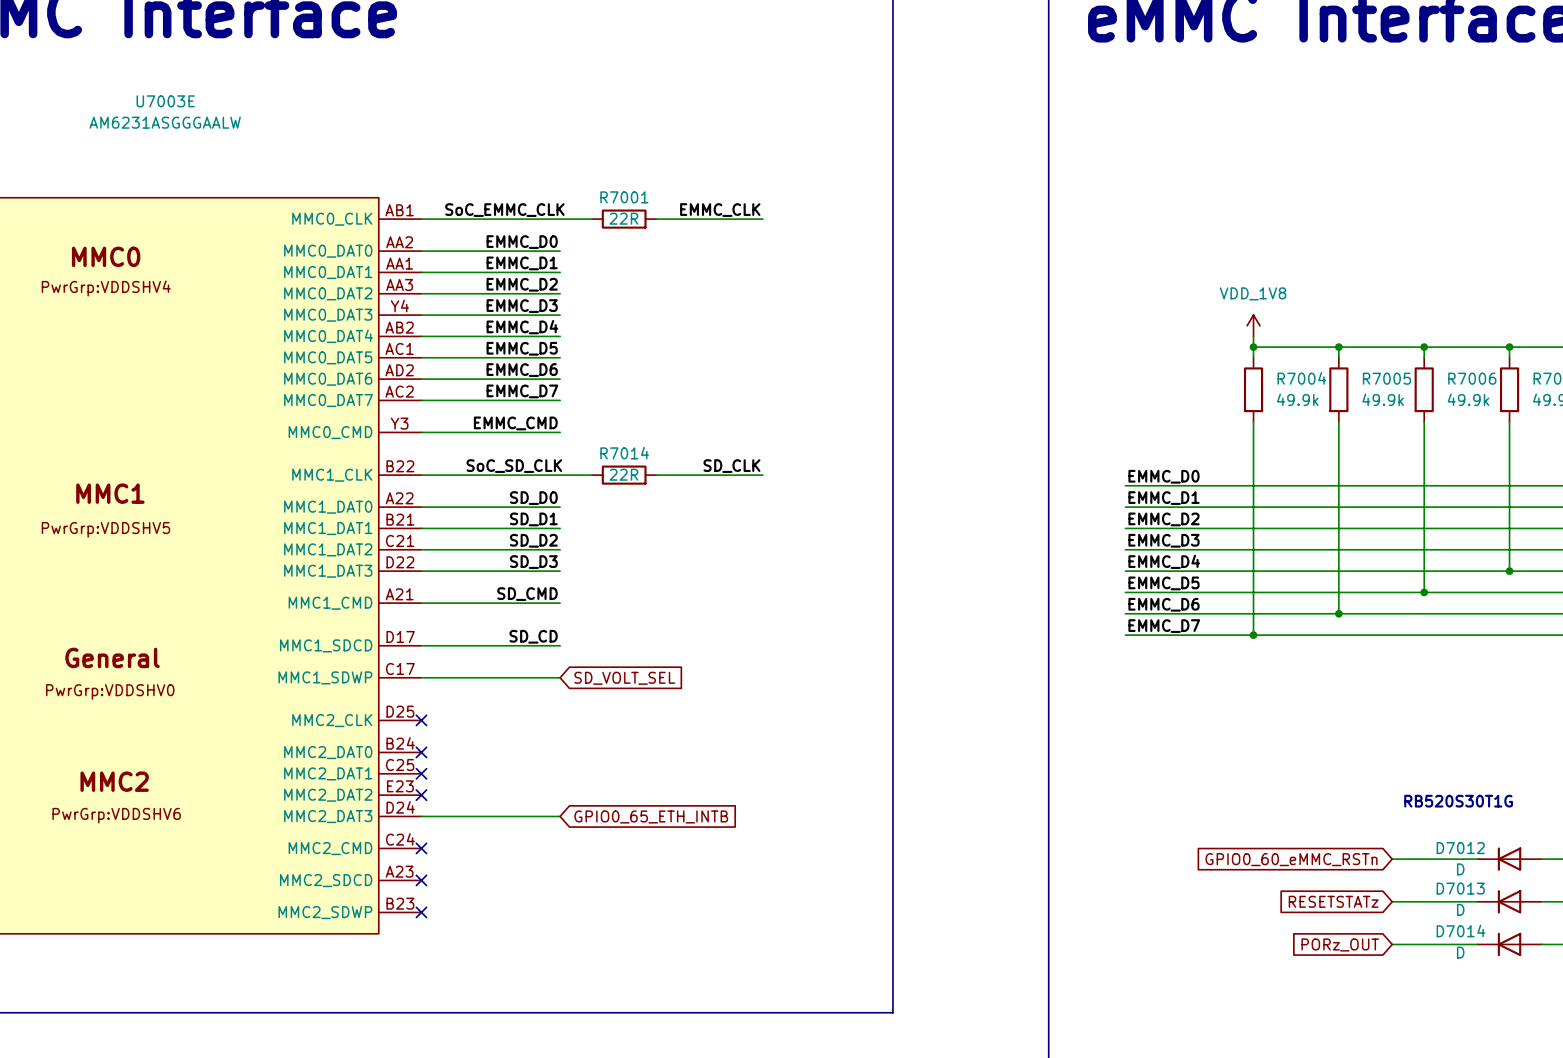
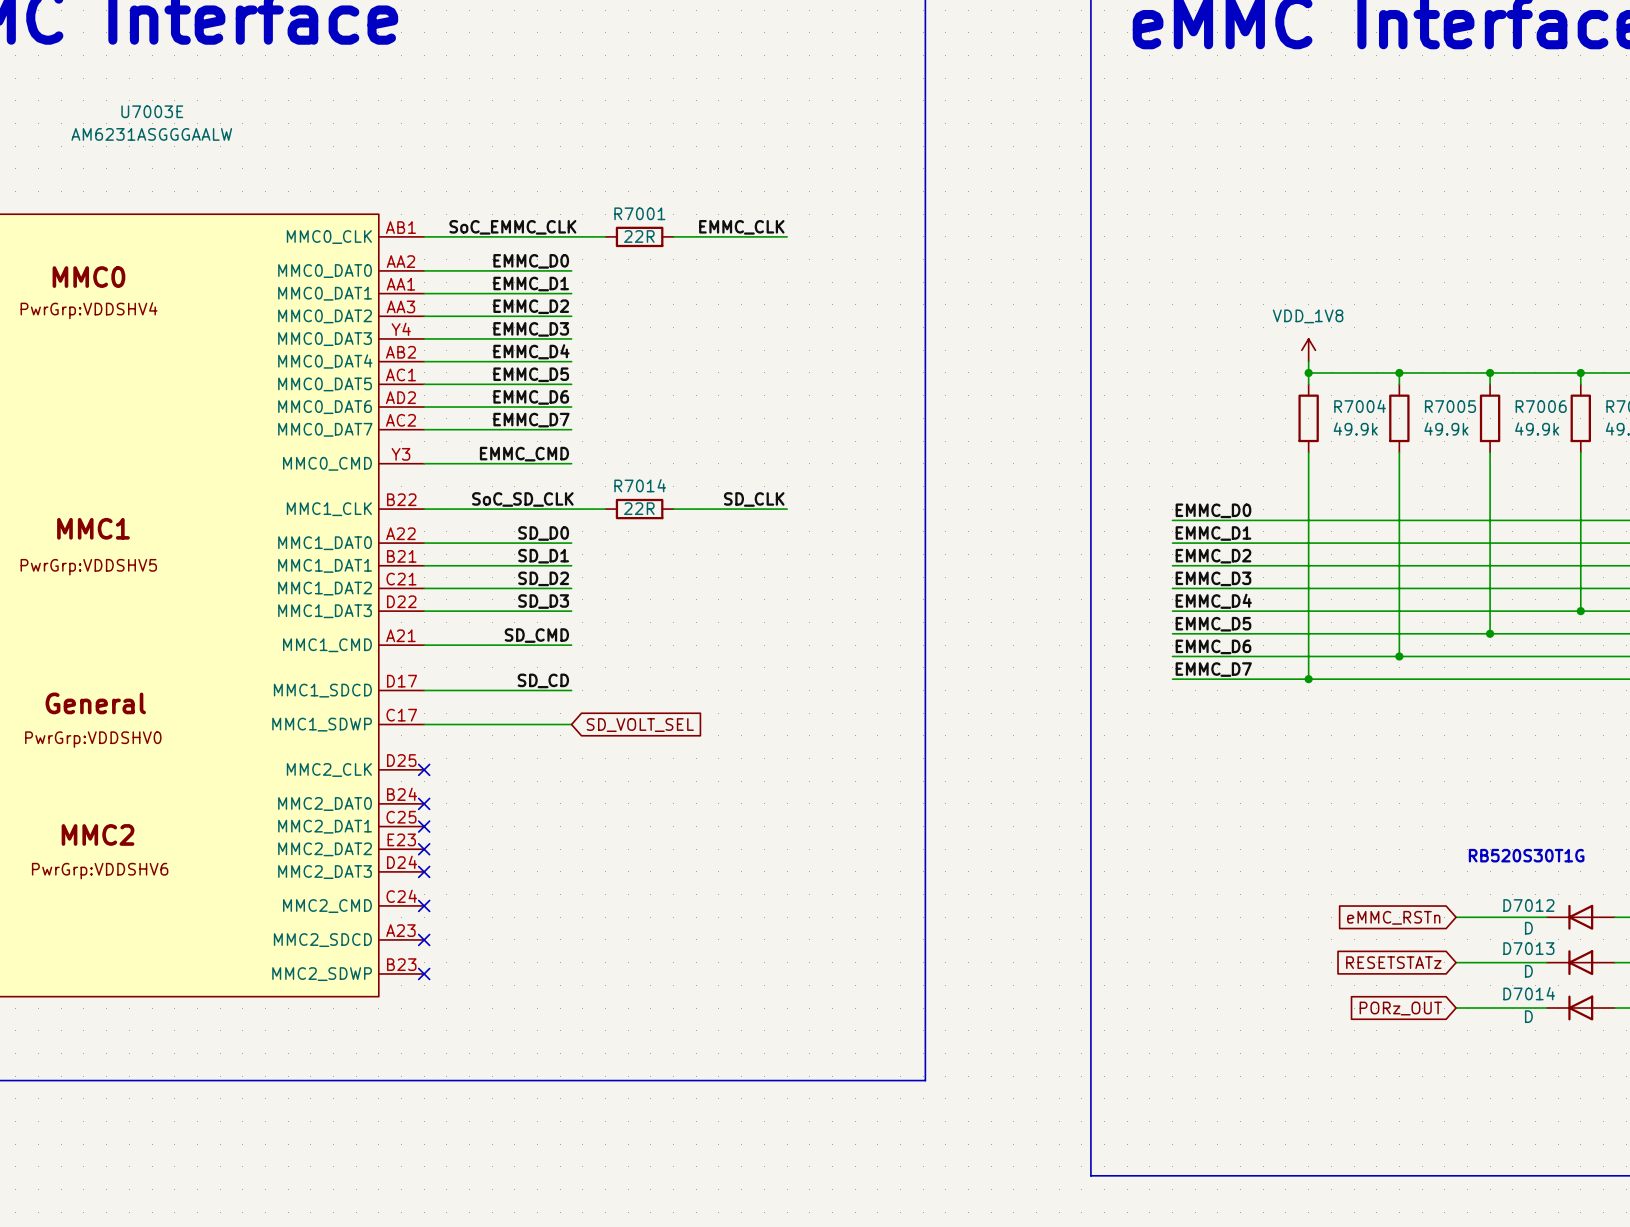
wire: (421, 816) (560, 816) -> none
no-connect mark: none -> (424, 871)
global label: GPIO0_65_ETH_INTB (651, 816) -> none
global label: GPIO0_60_eMMC_RSTn (1291, 859) -> eMMC_RSTn (1393, 917)

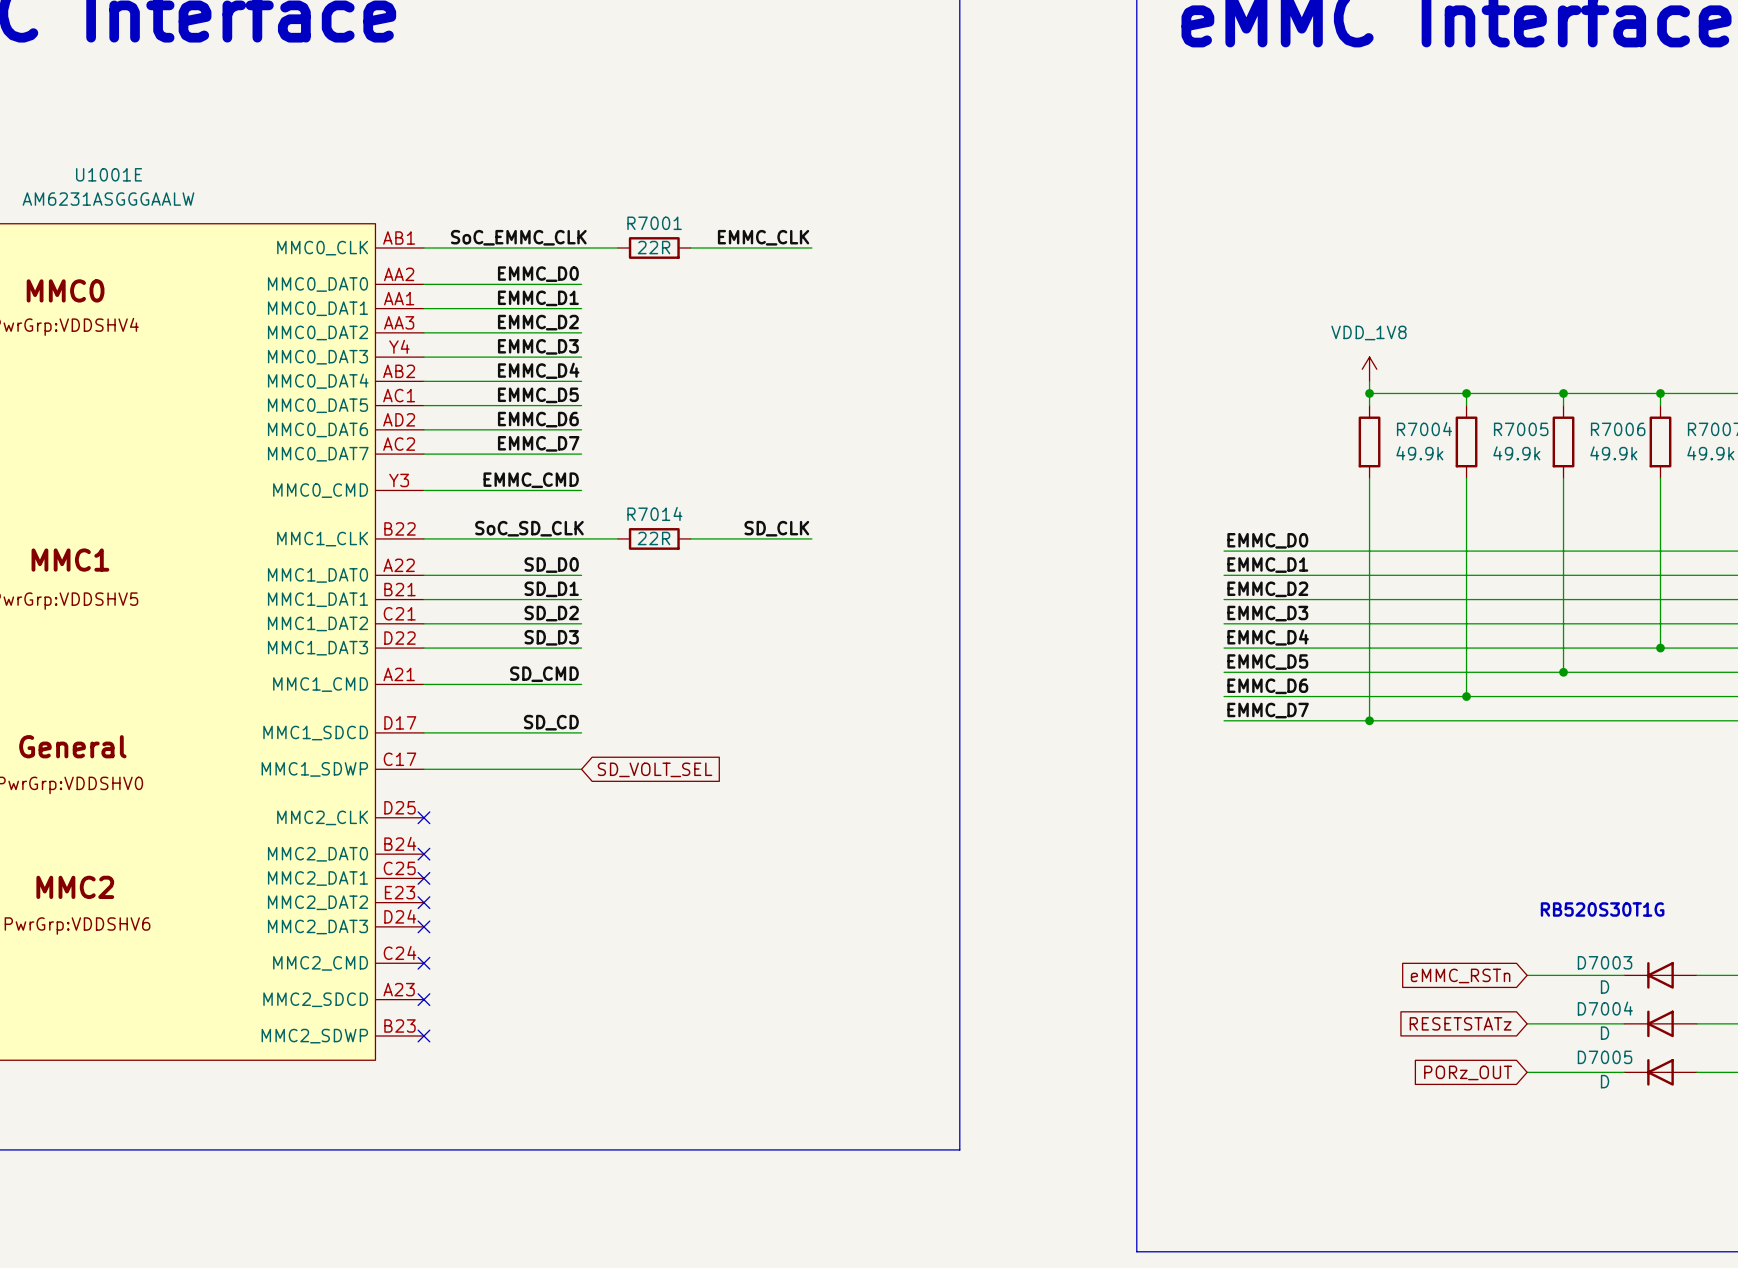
U7003E name: U7003E (152, 111) -> U1001E (109, 174)
U7003E value position: AM6231ASGGGAALW (151, 134) -> AM6231ASGGGAALW (108, 199)
D7012 name: D7012 (1528, 905) -> D7003 (1605, 962)
D7013 name: D7013 (1528, 948) -> D7004 (1605, 1008)
D7014 name: D7014 (1529, 993) -> D7005 (1605, 1057)

